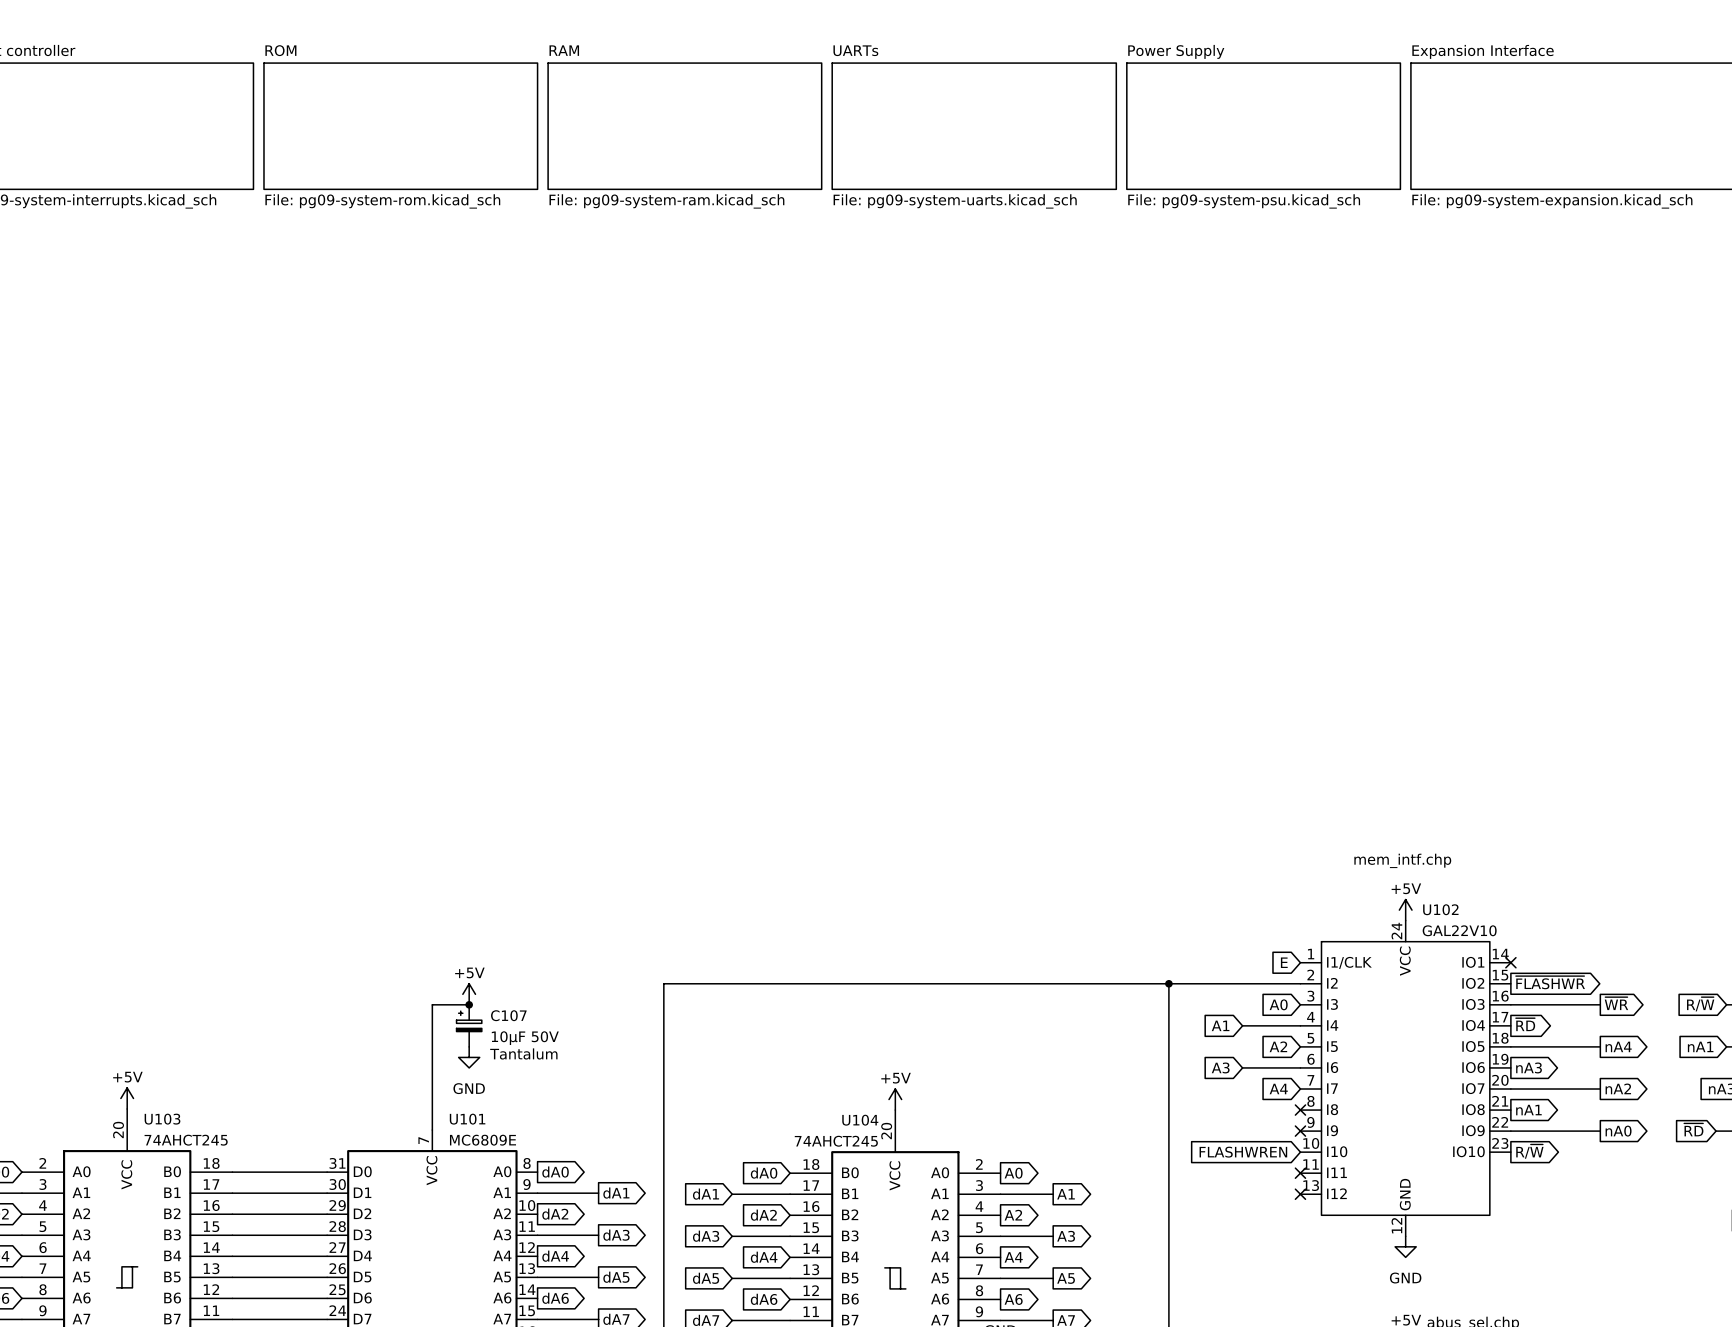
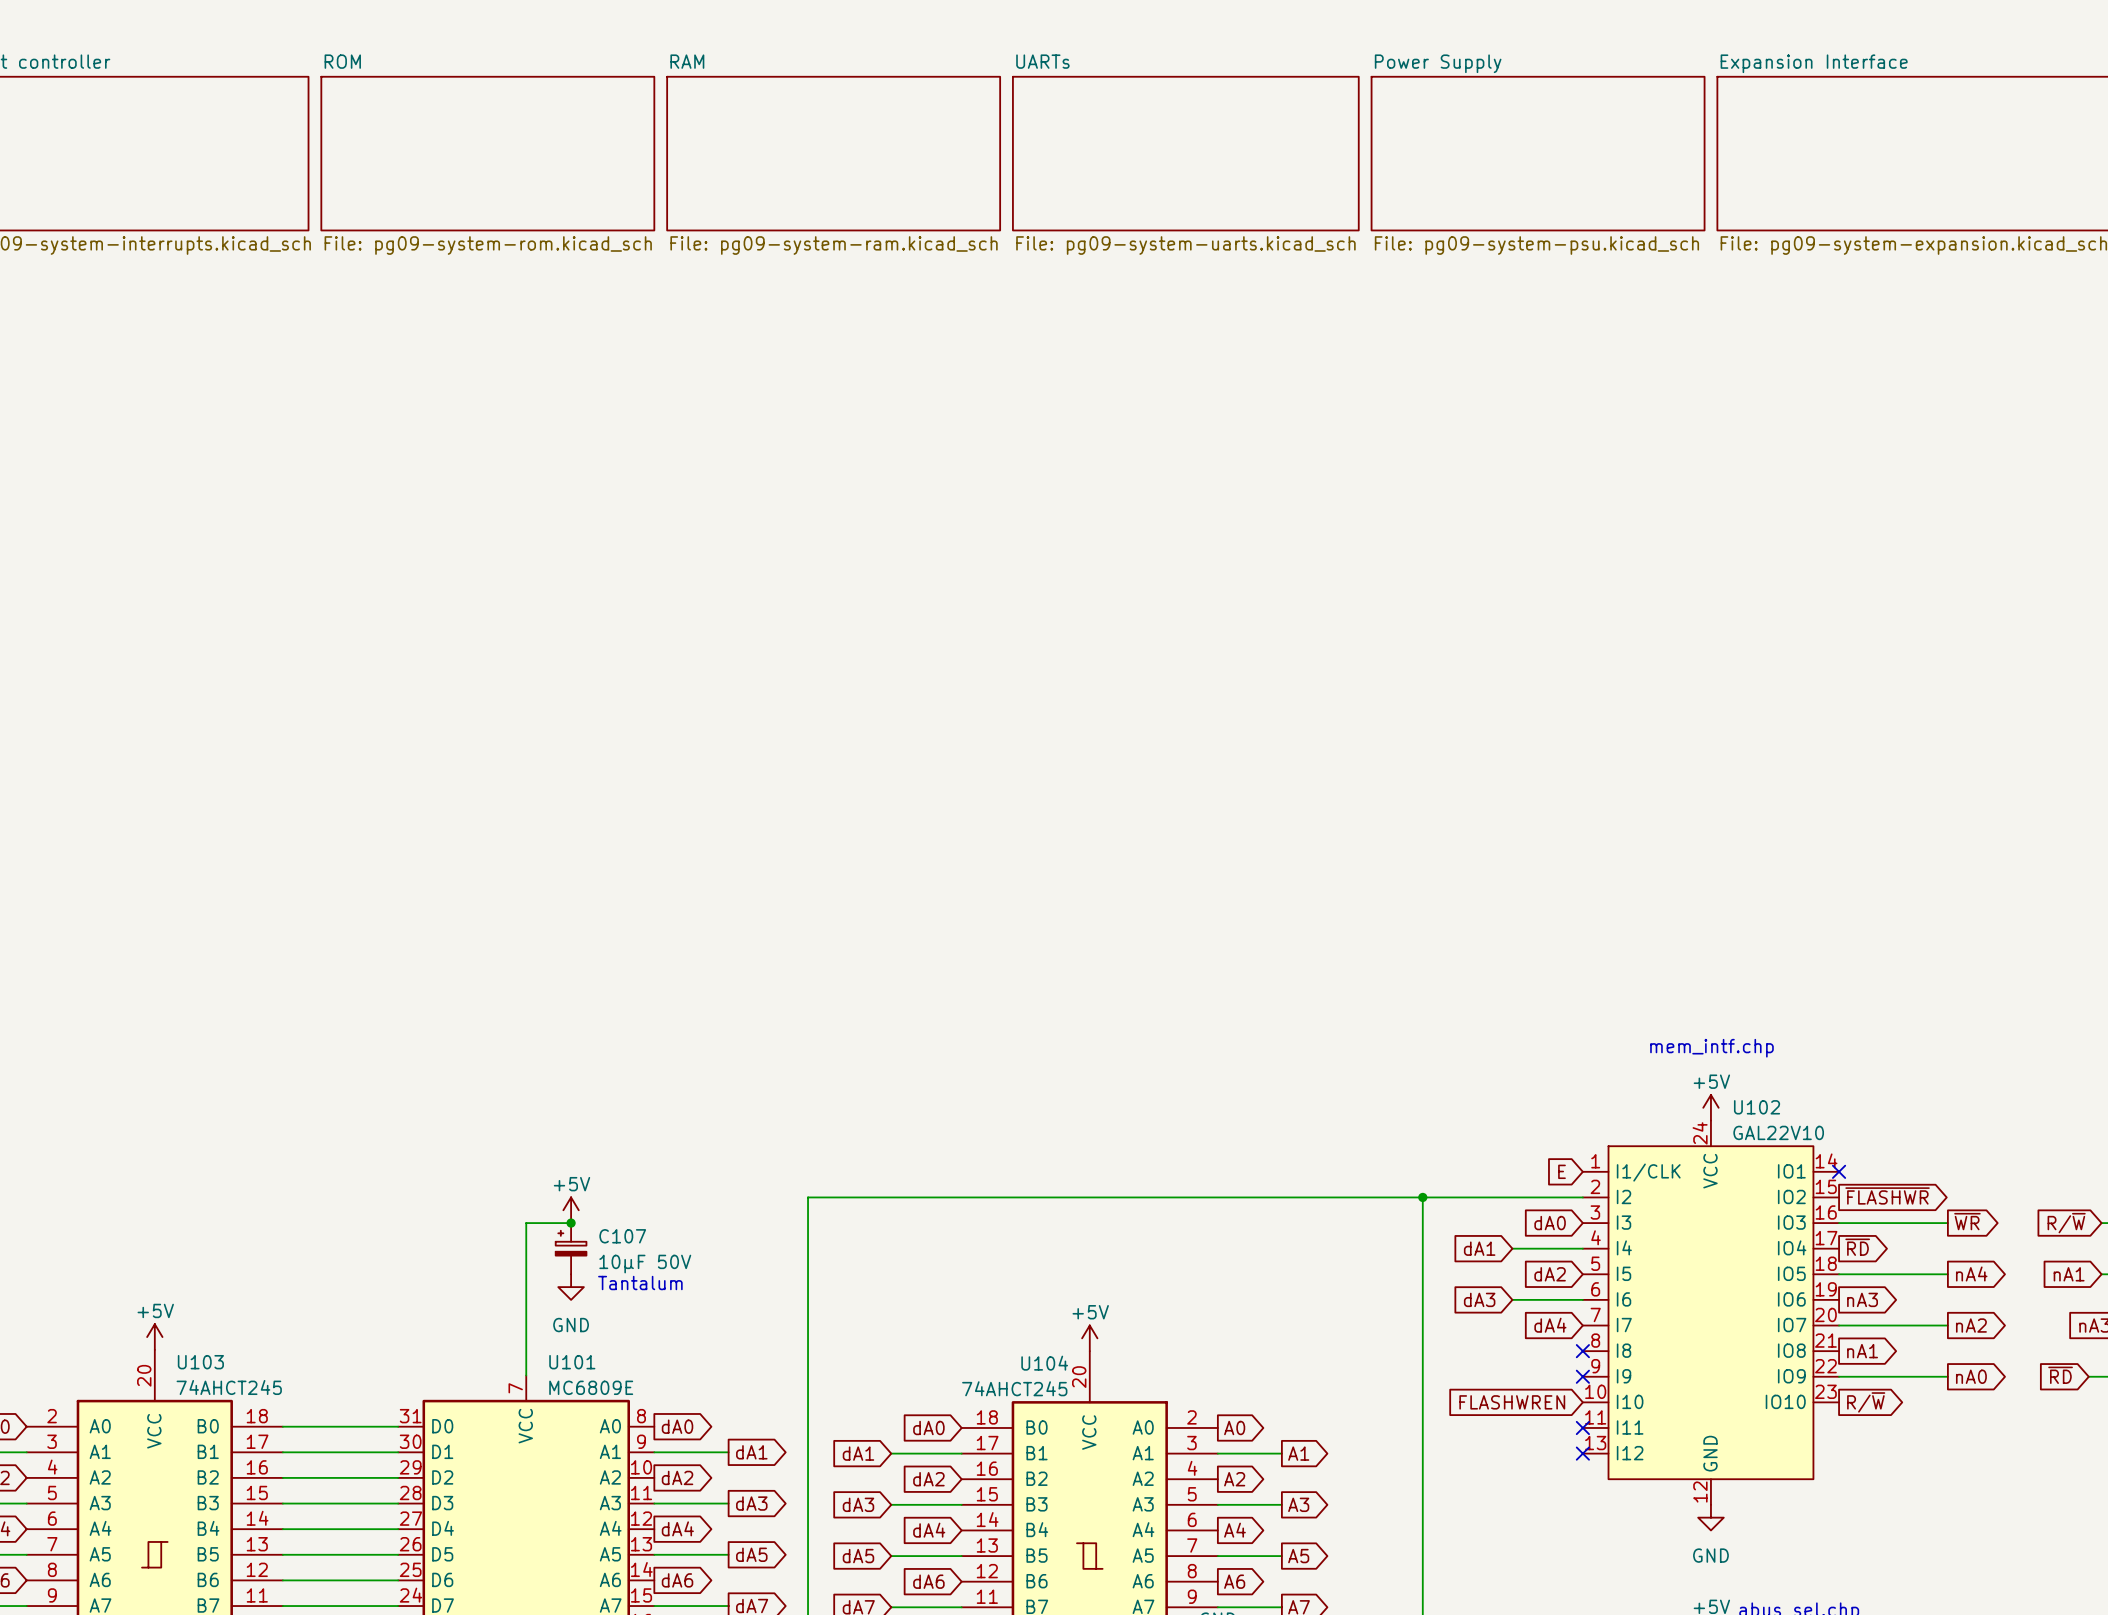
global label: A0 (1278, 1004) -> dA0 (1550, 1223)
global label: A1 (1220, 1025) -> dA1 (1479, 1248)
global label: A2 (1278, 1046) -> dA2 (1550, 1274)
global label: A3 (1220, 1067) -> dA3 (1479, 1299)
global label: A4 (1278, 1089) -> dA4 (1550, 1325)

